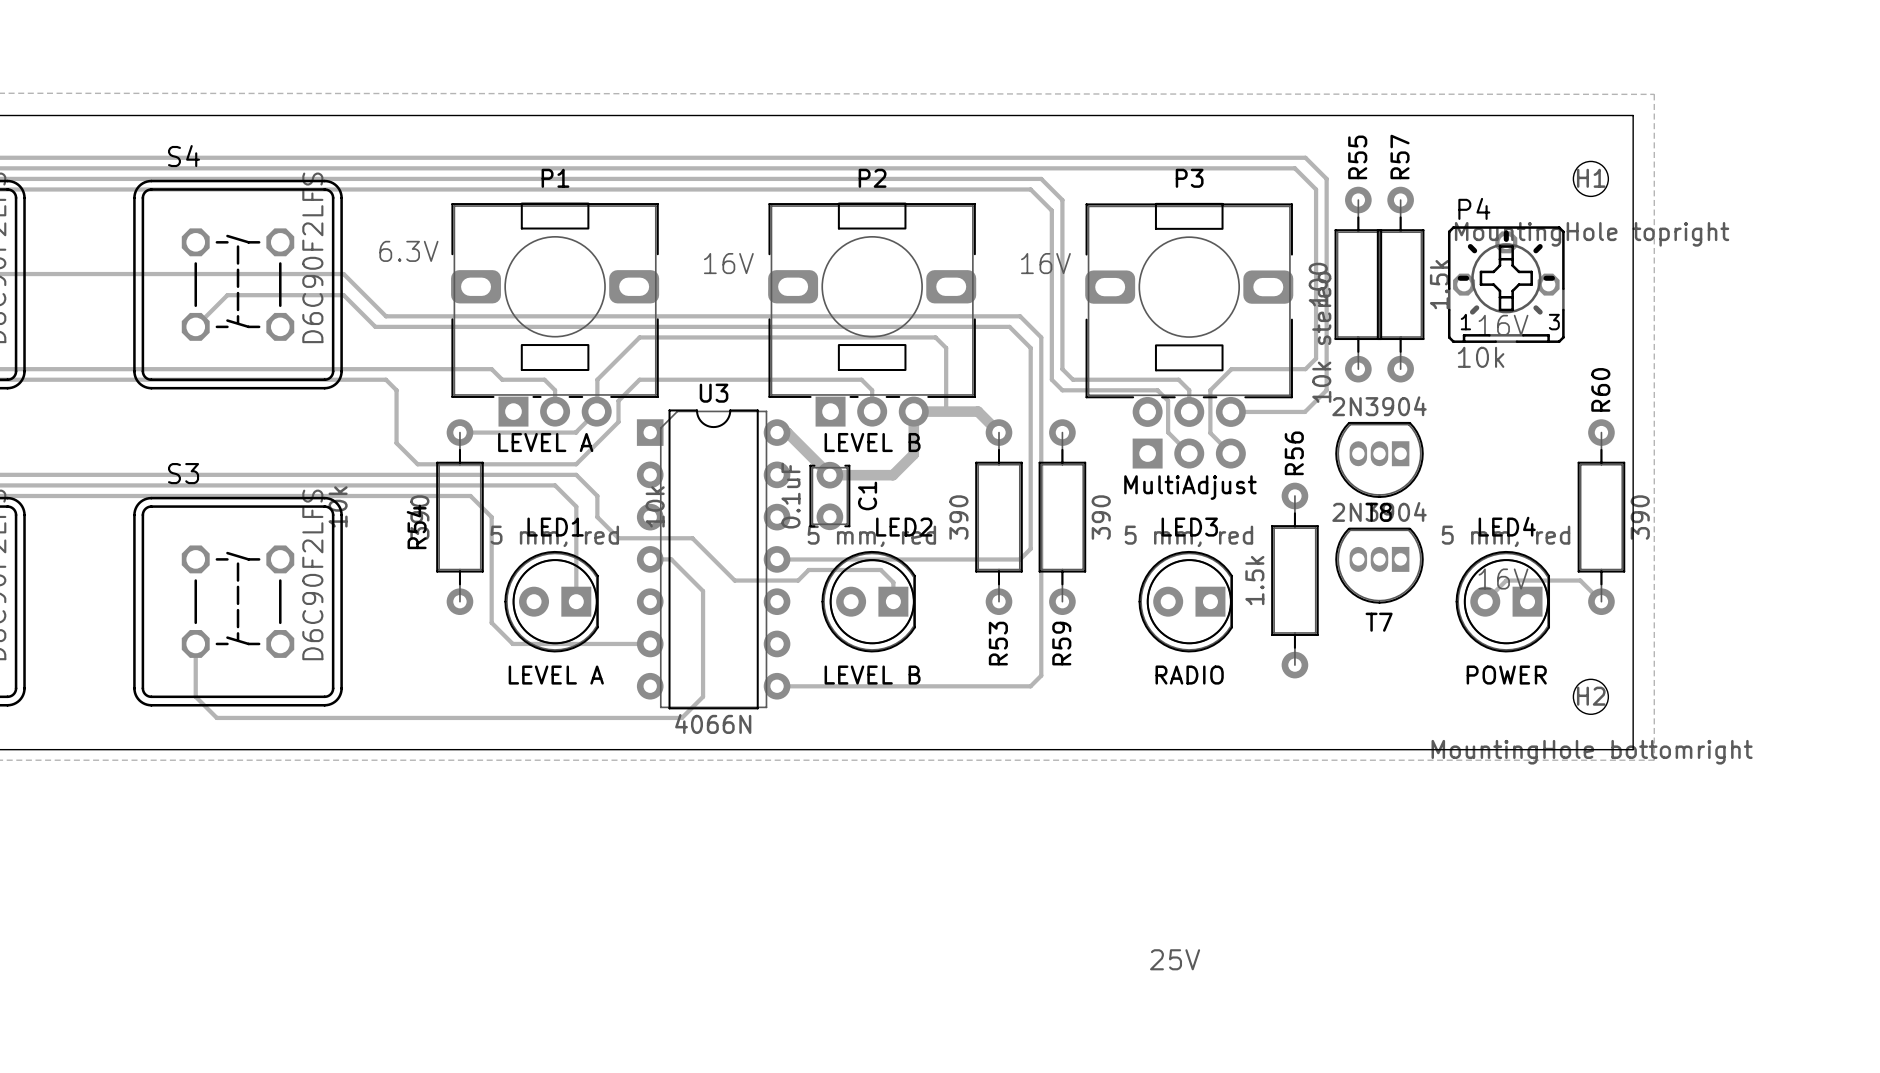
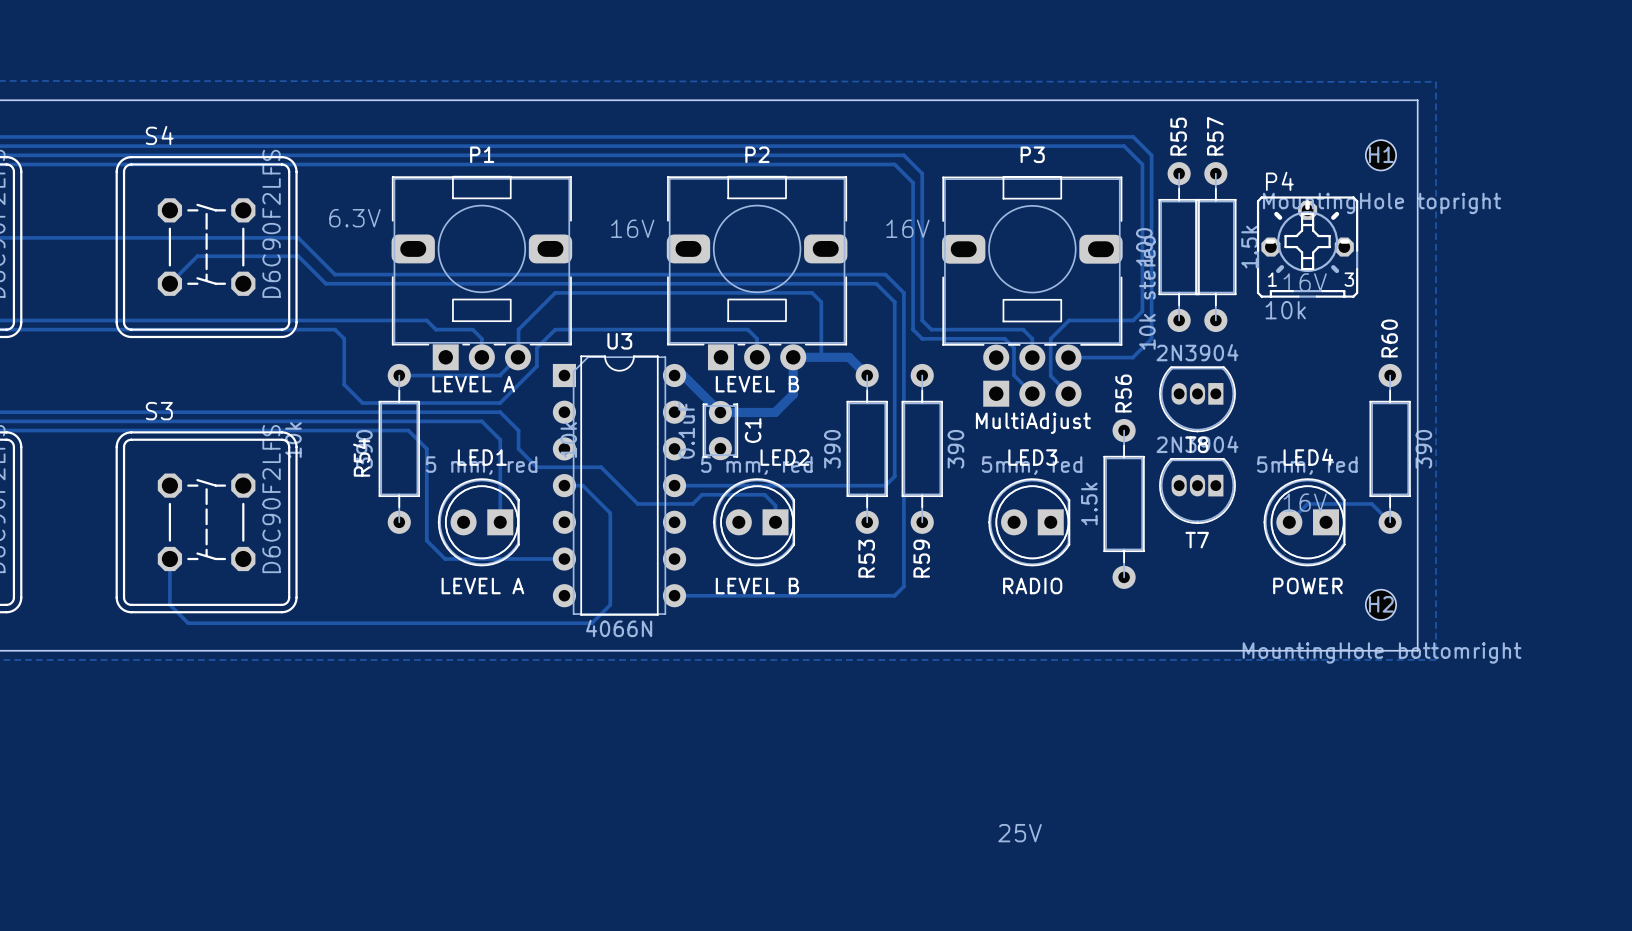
LED3 value: 5 mm, red (1188, 536) -> 5mm, red (1032, 465)
LED4 value: 5 mm, red (1506, 536) -> 5mm, red (1307, 465)

